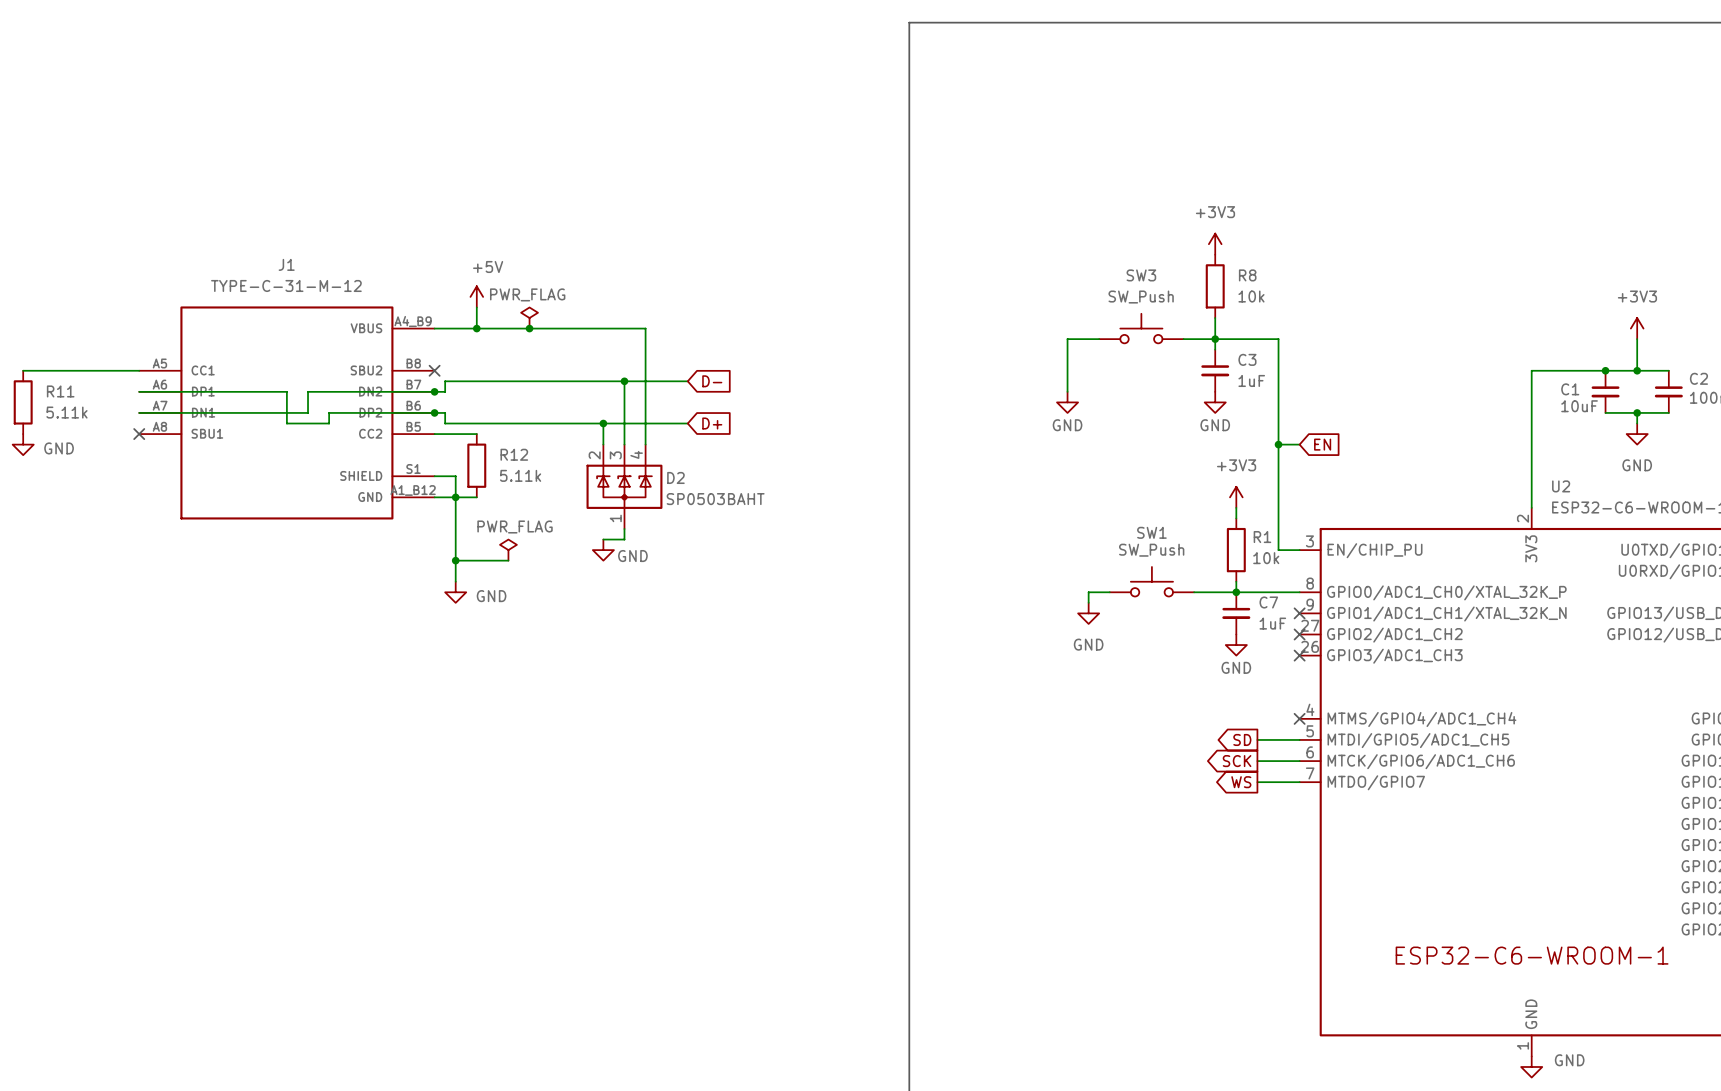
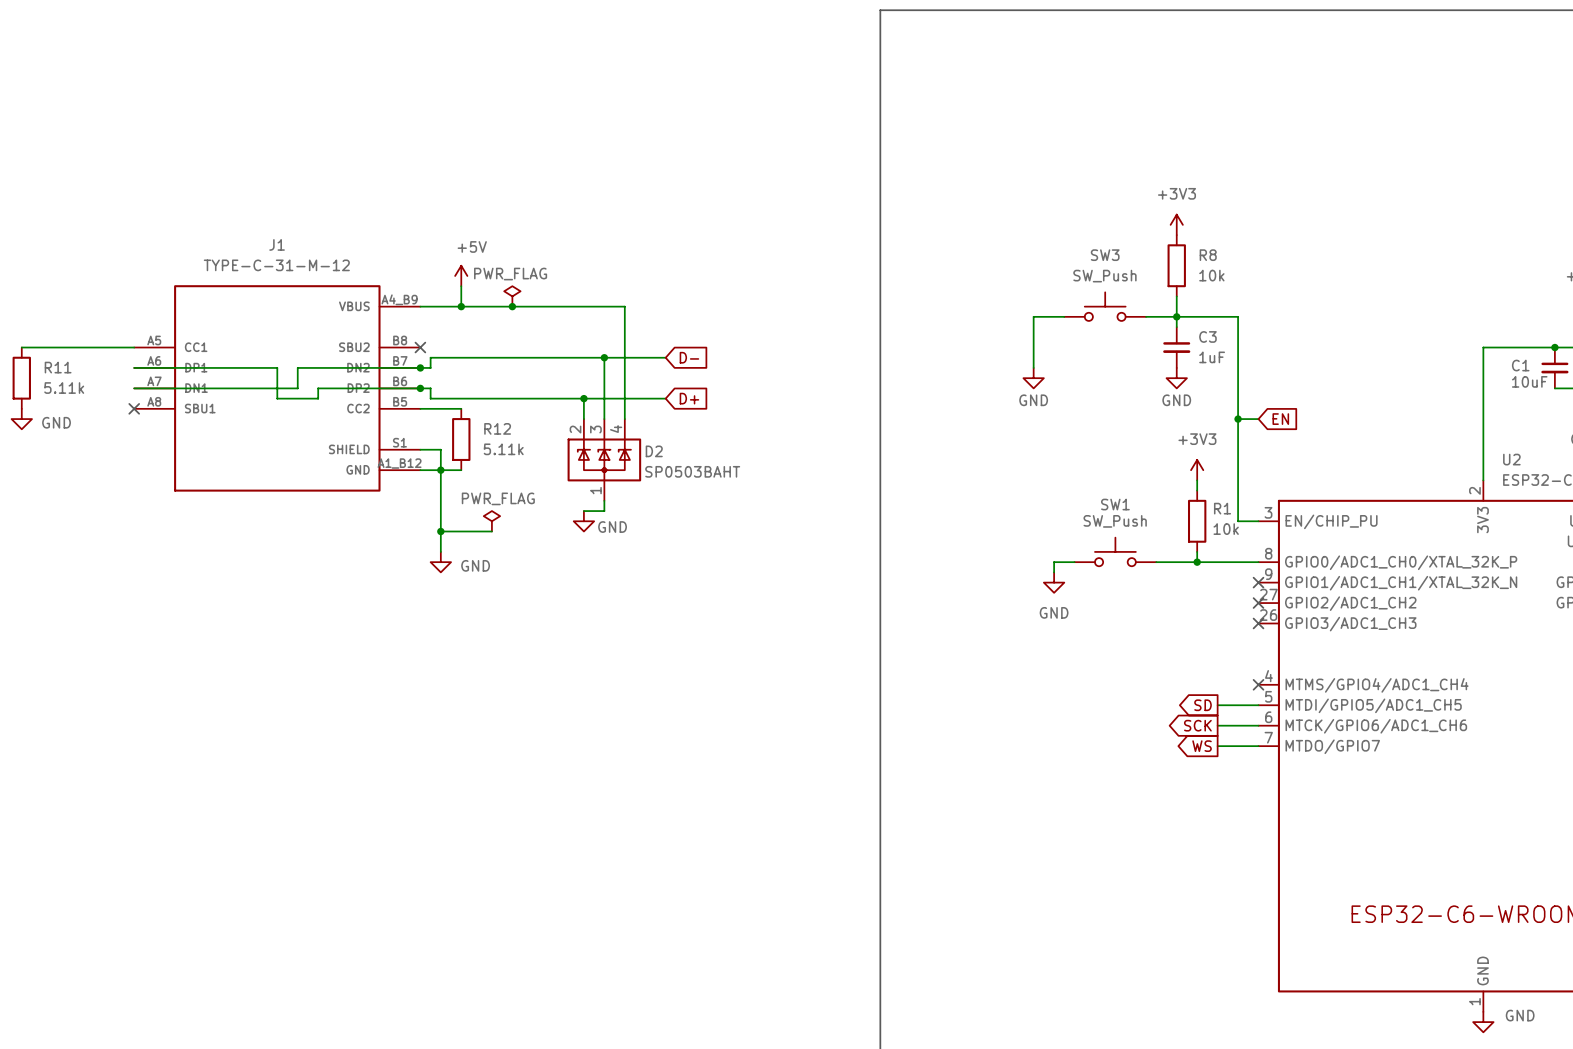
C7: 1uF (1236, 613) -> none
power symbol: GND (1236, 645) -> none

